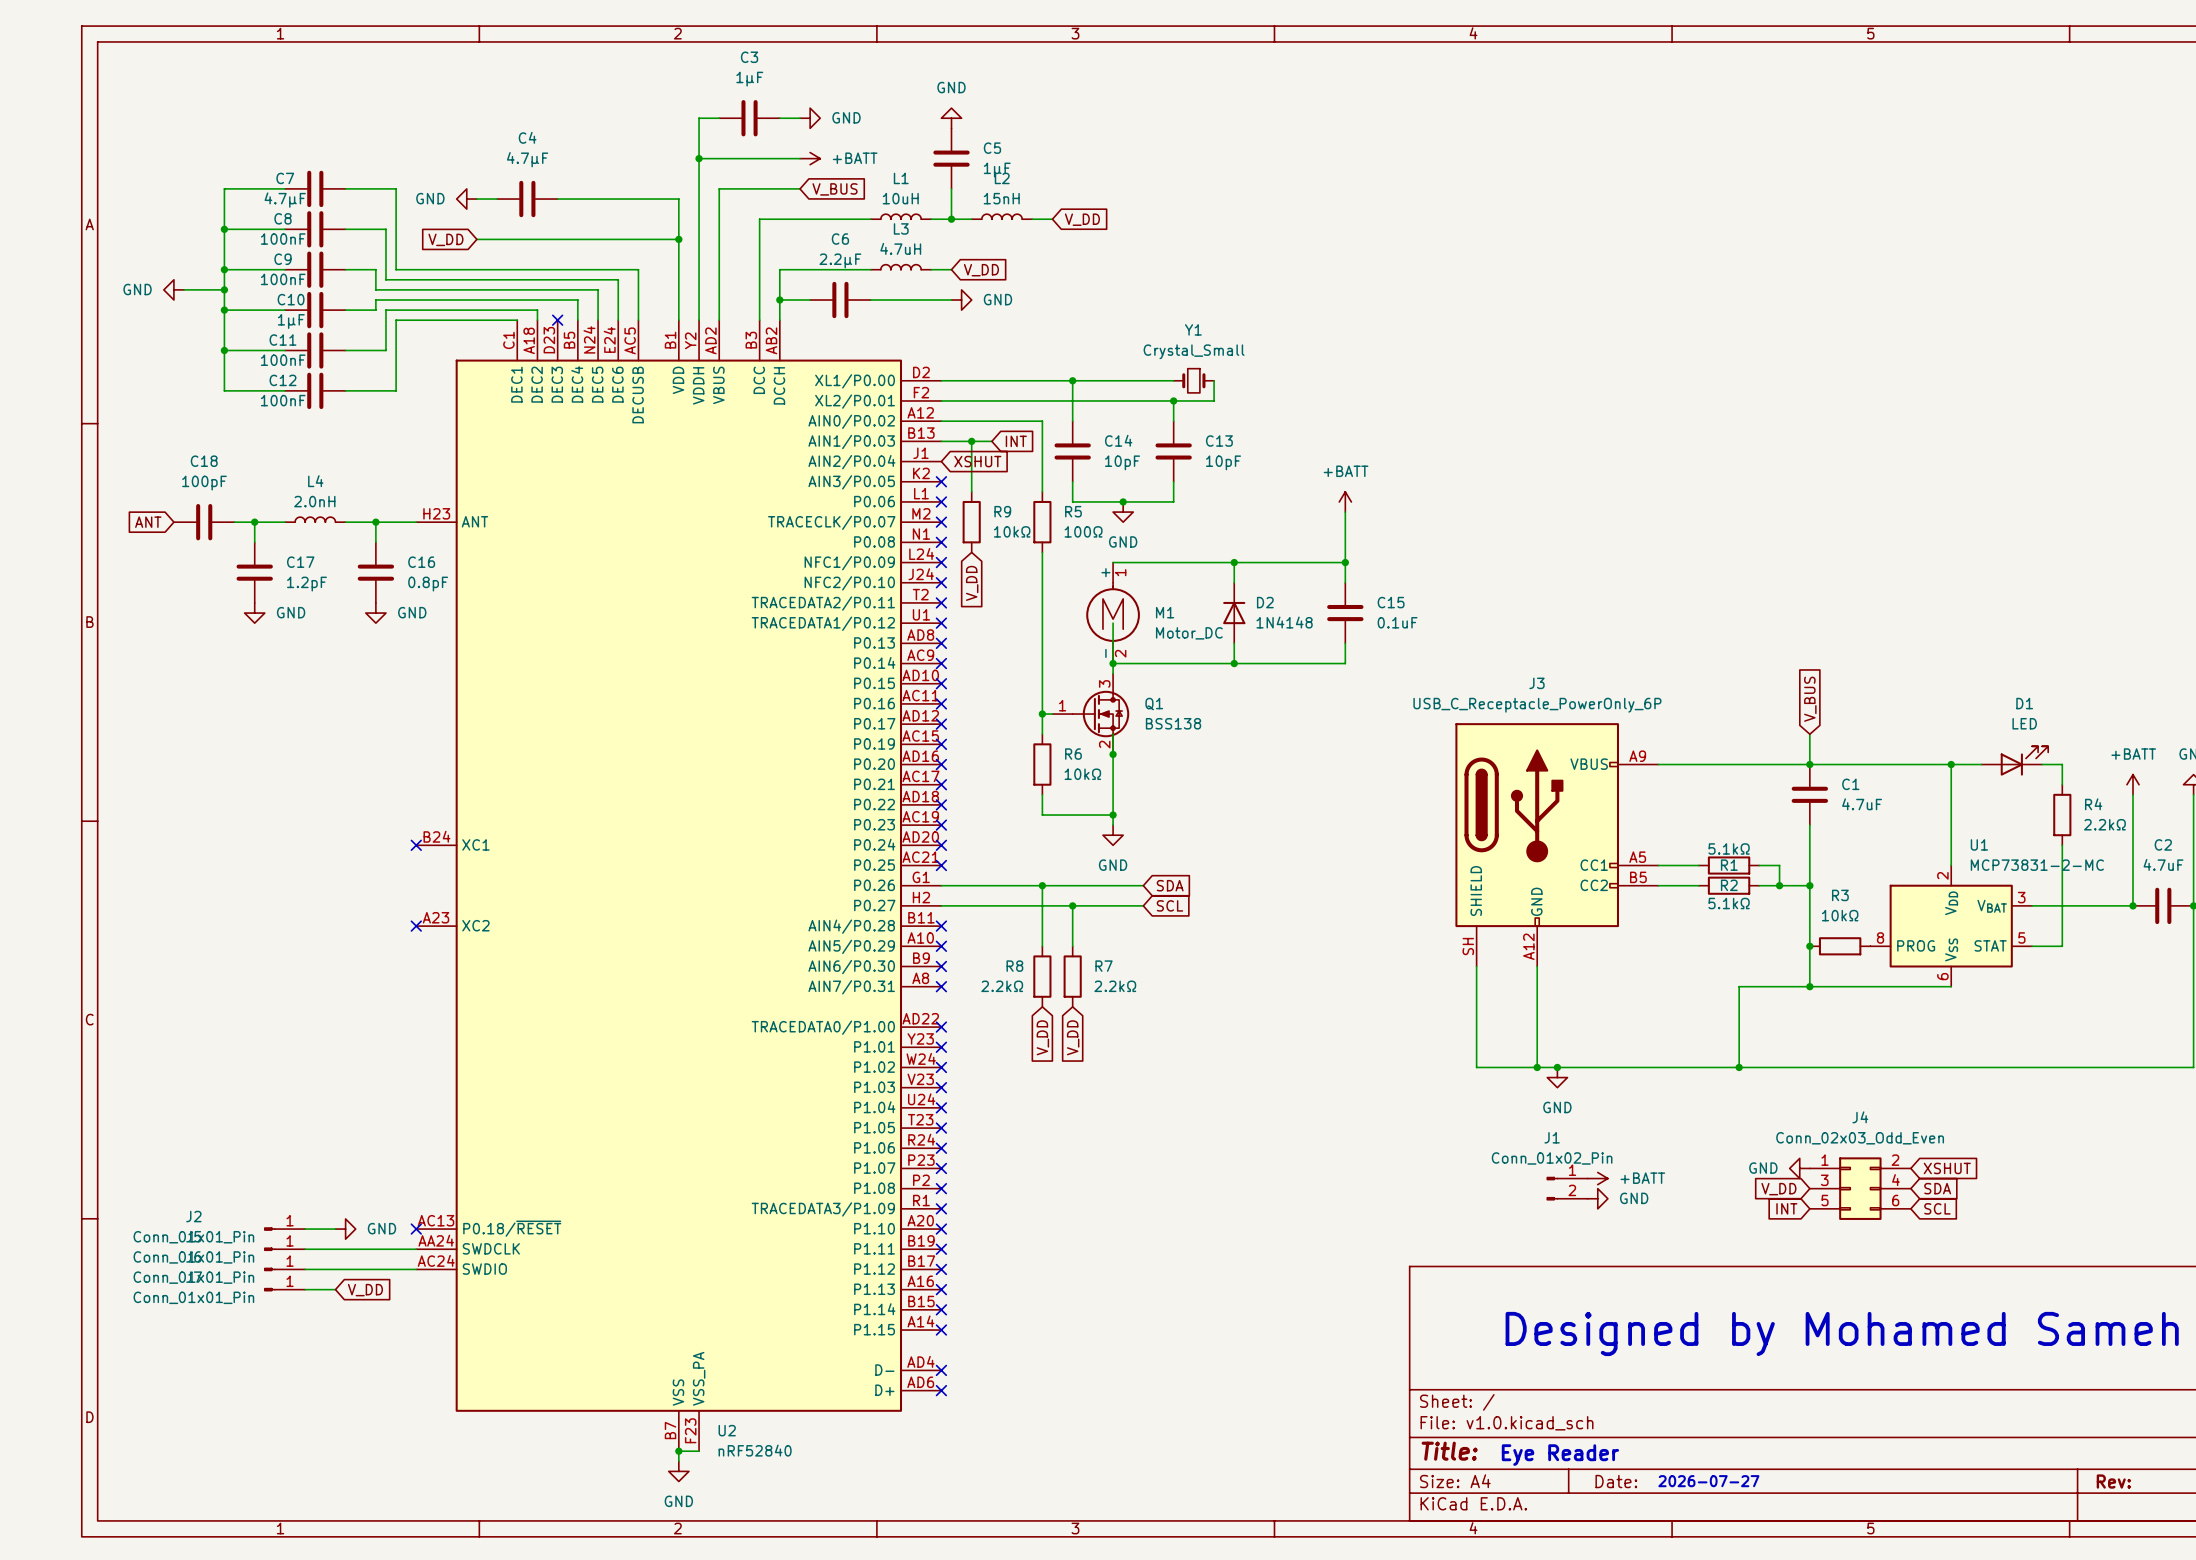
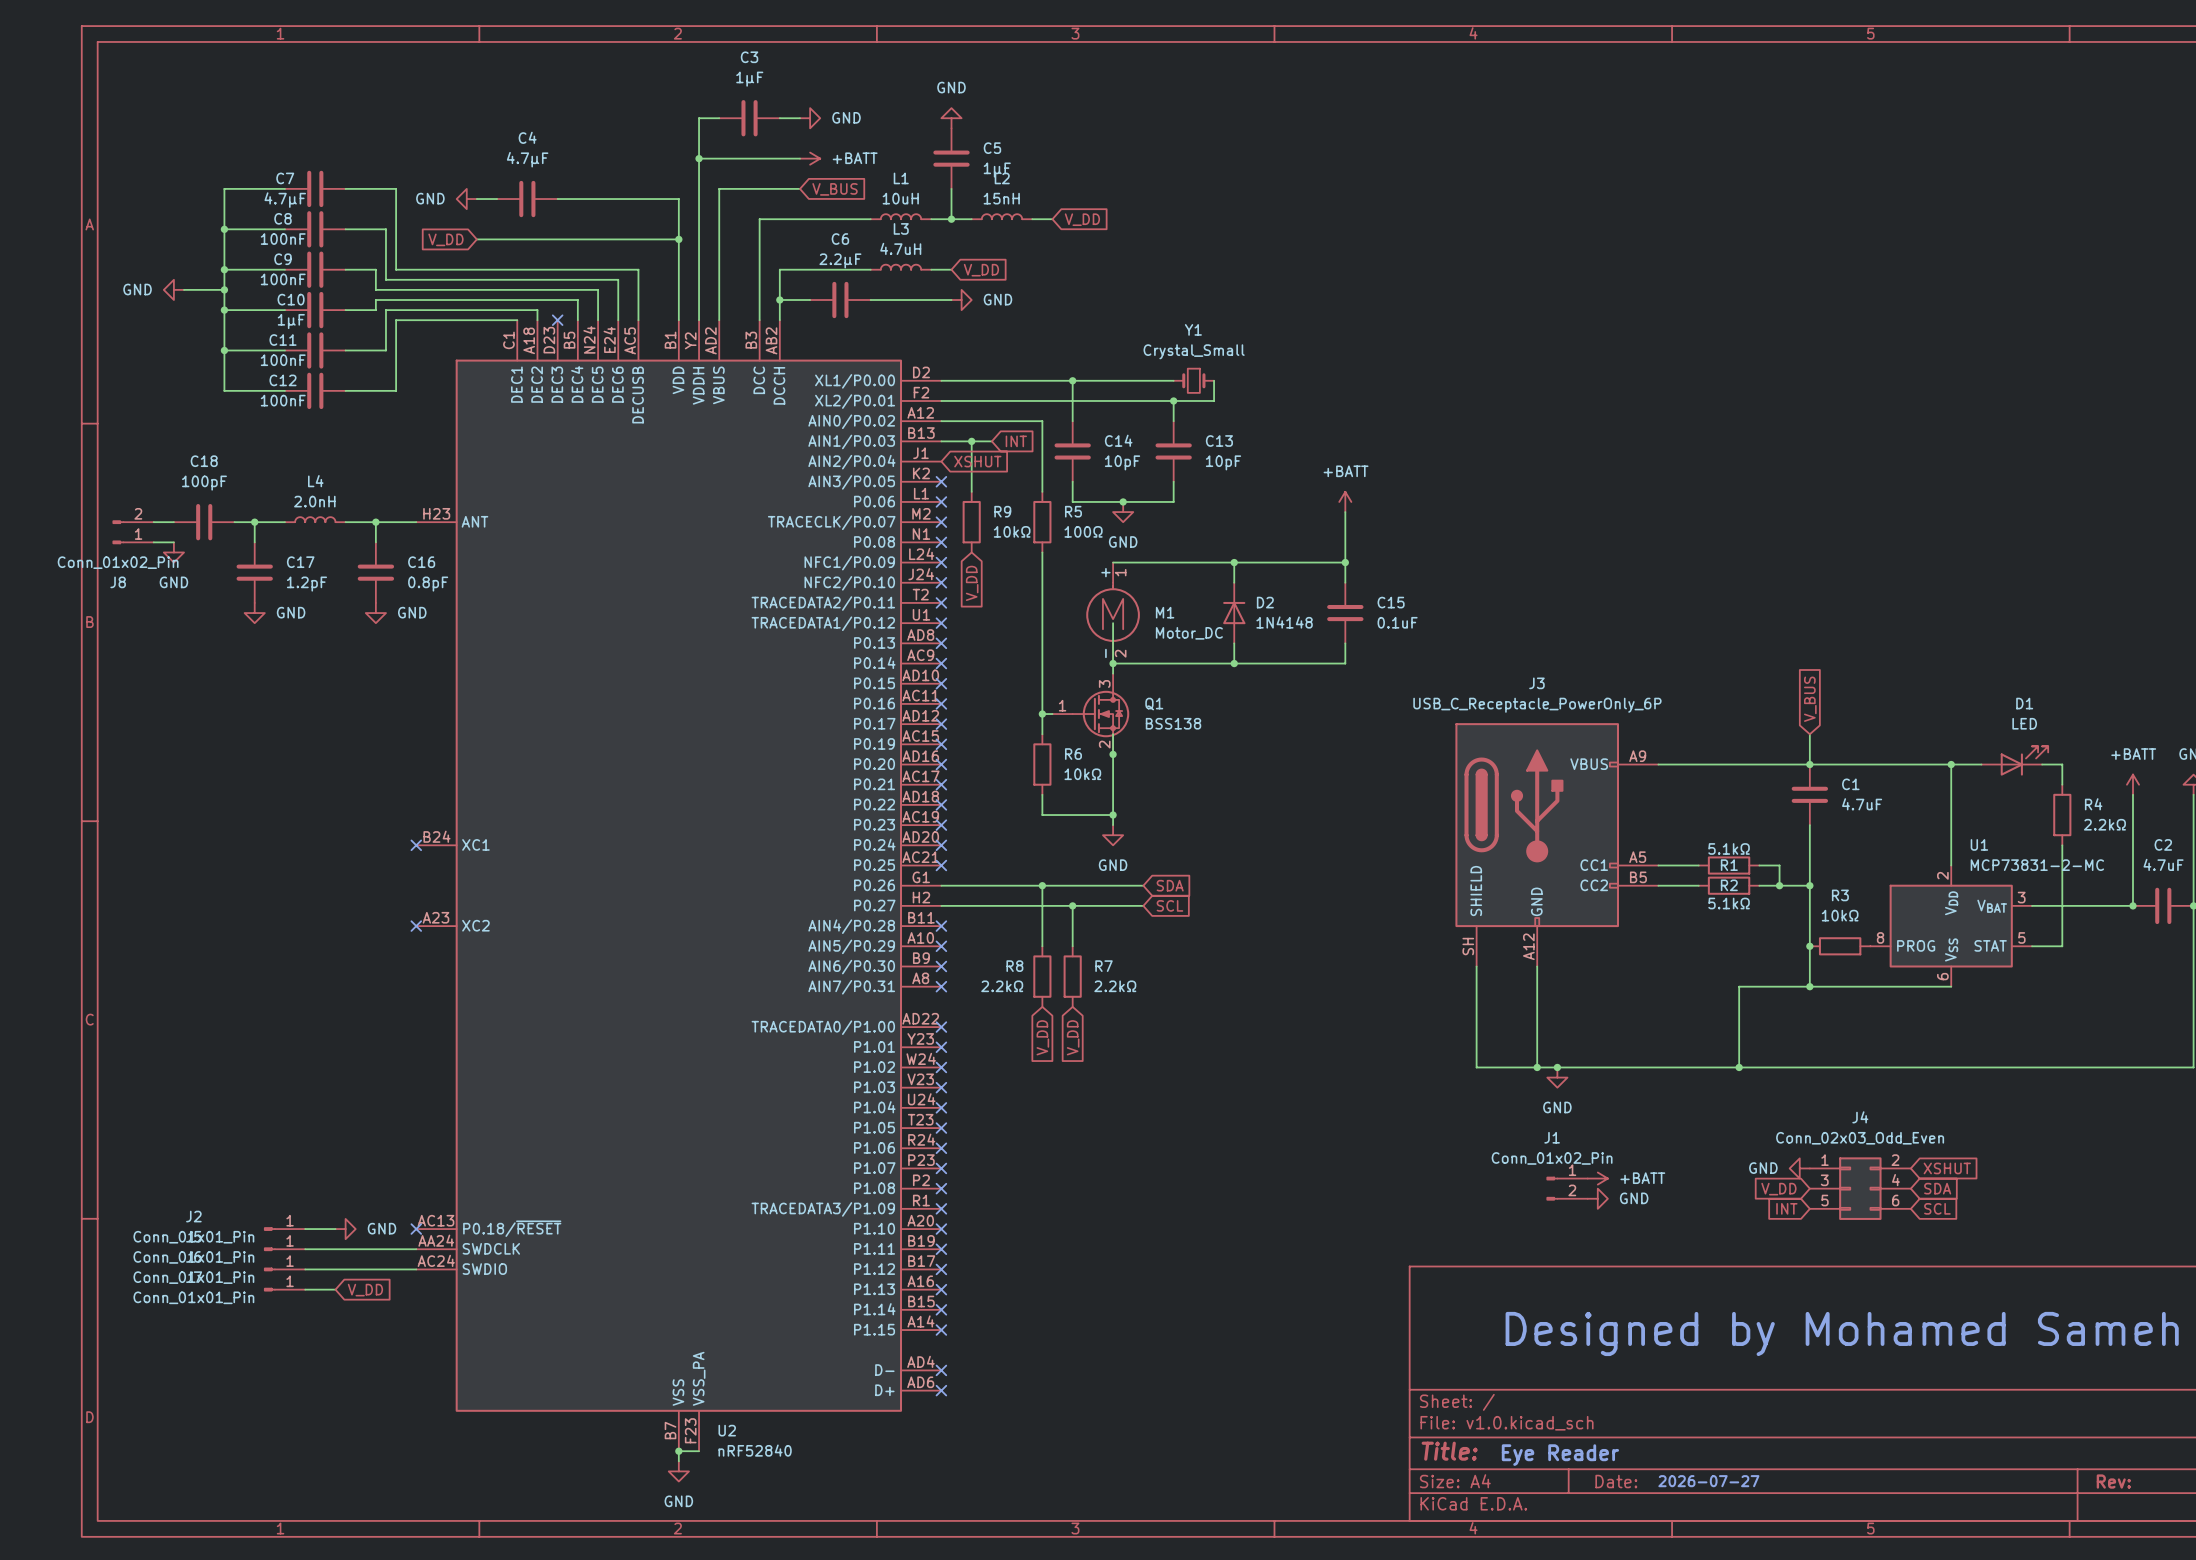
global label: ANT (148, 522) -> none
wire: none -> (153, 522) (173, 522)
J8: none -> Conn_01x02_Pin (133, 532)
wire: none -> (153, 542) (173, 542)
power symbol: none -> GND (173, 552)

